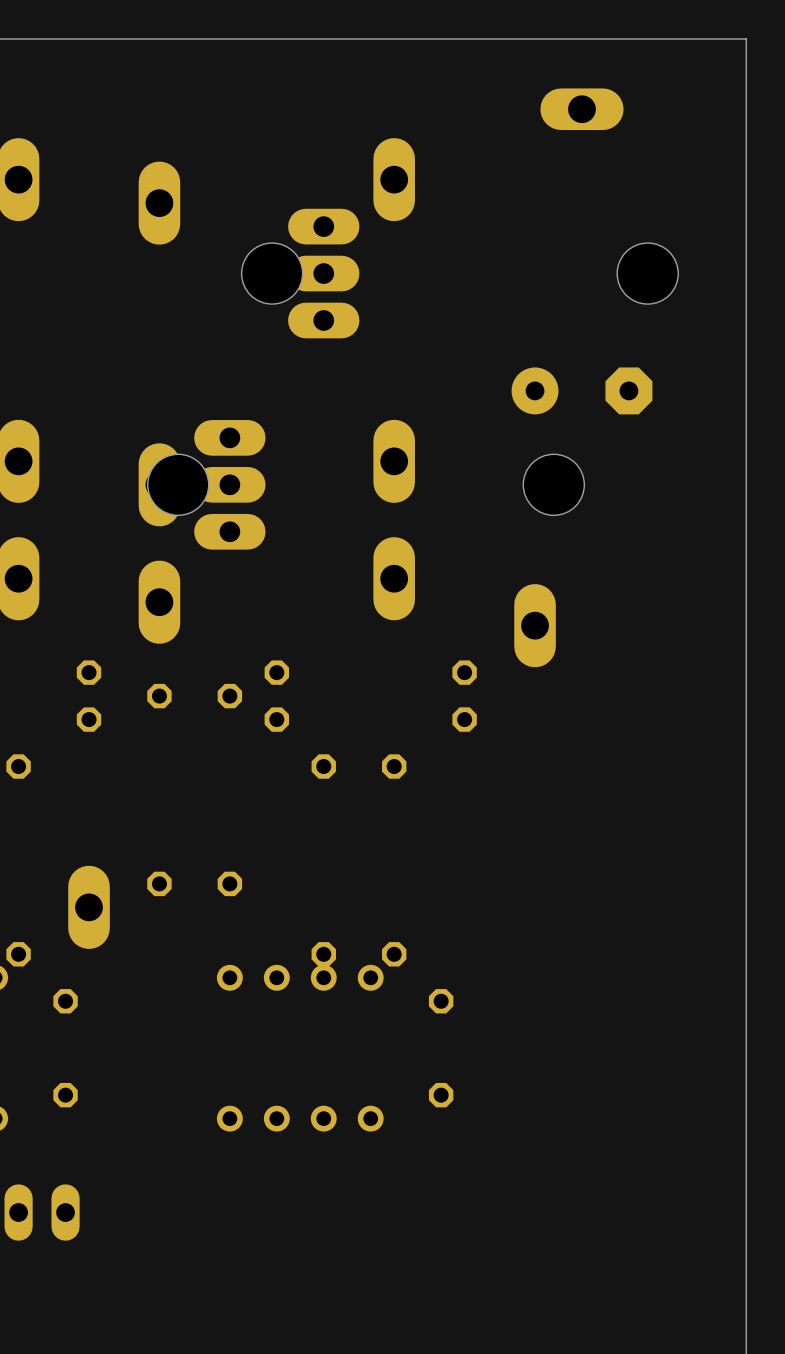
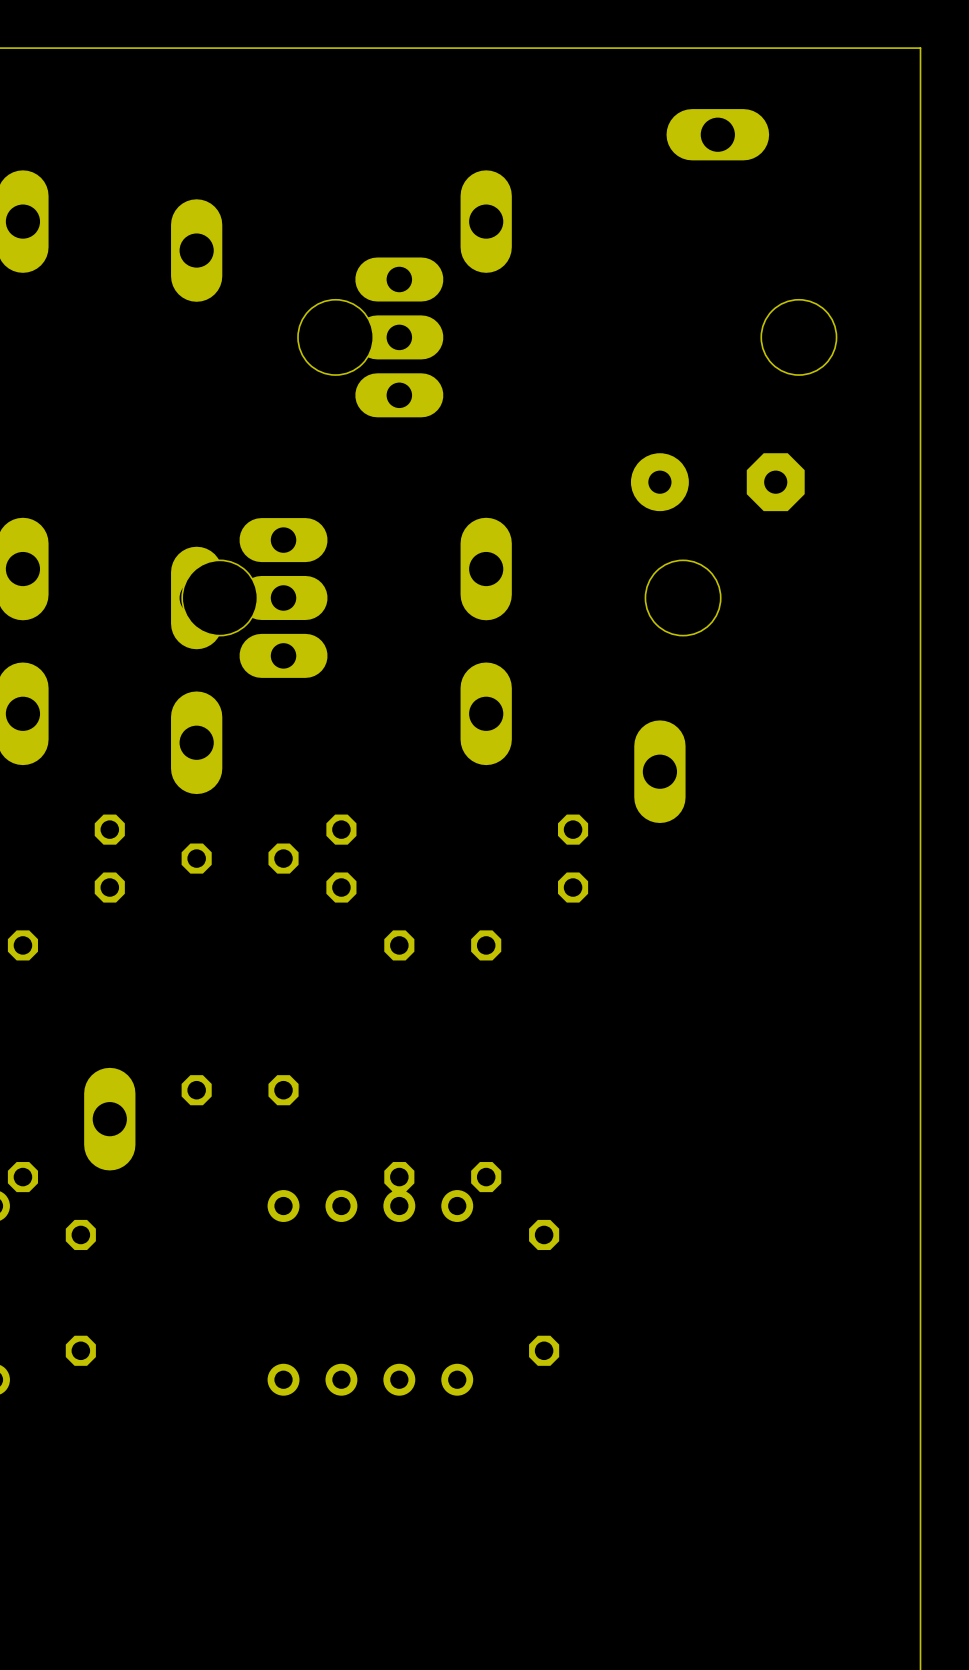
part: (42, 1212) -> none

